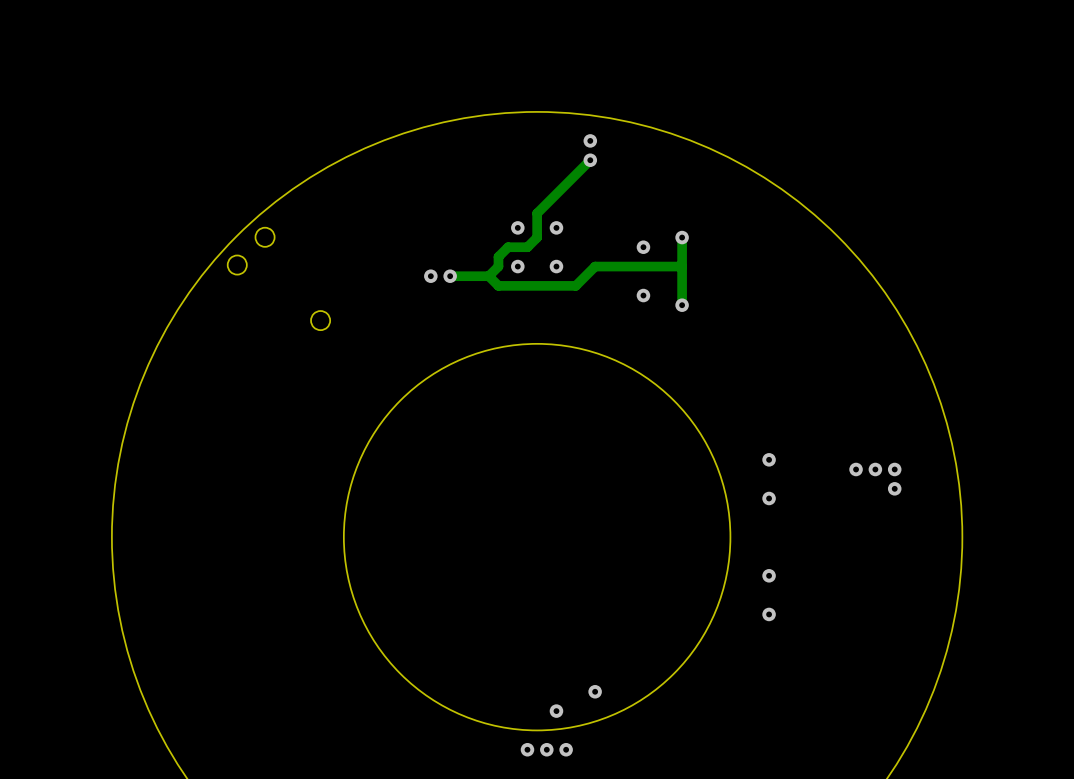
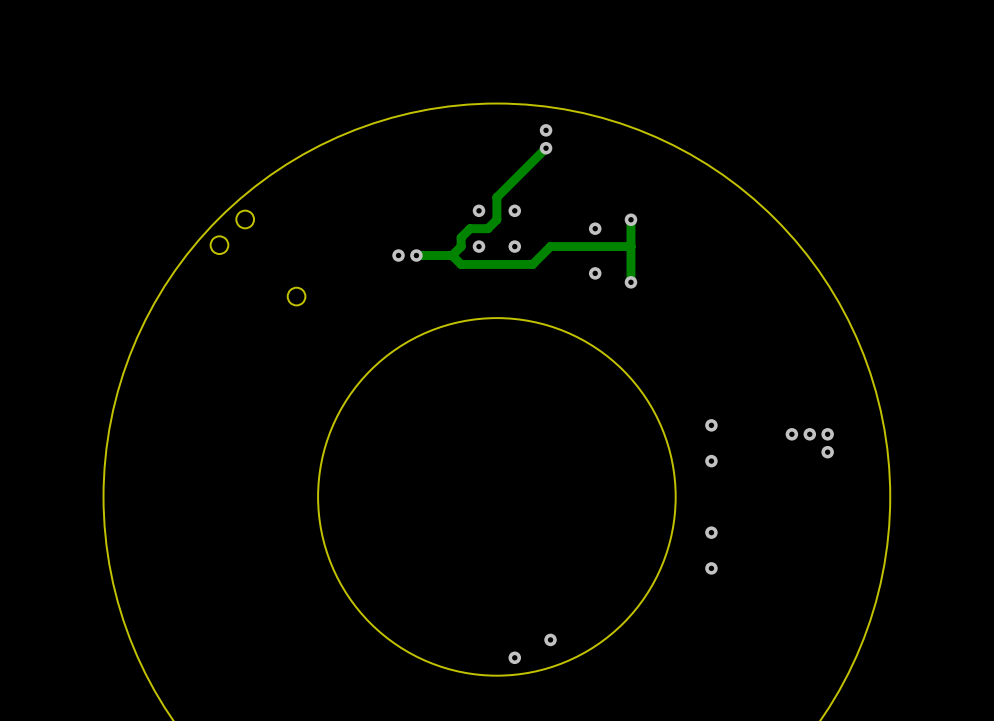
via: (527, 749) -> none
via: (546, 749) -> none
via: (566, 749) -> none

